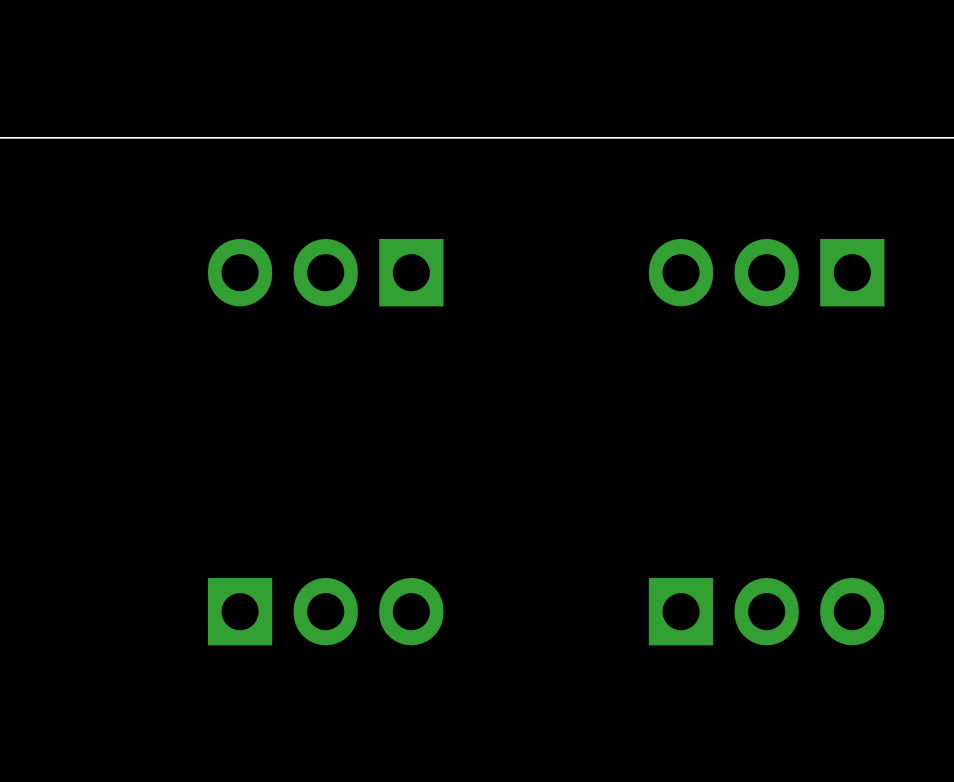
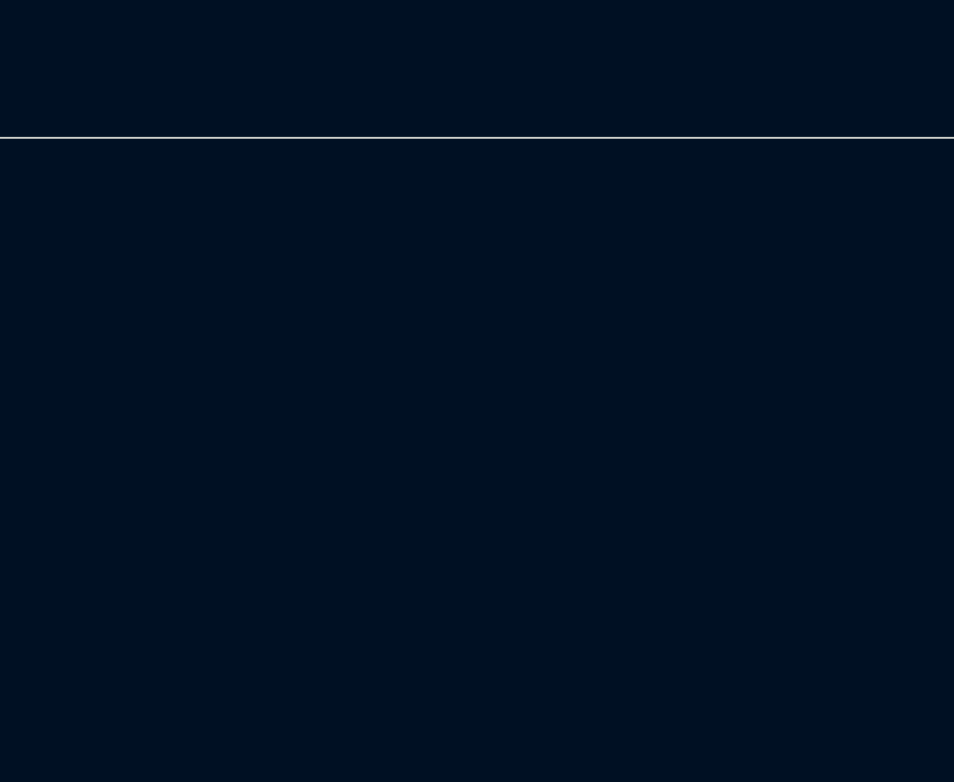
part: (325, 272) -> none
part: (766, 272) -> none
part: (325, 611) -> none
part: (766, 611) -> none

